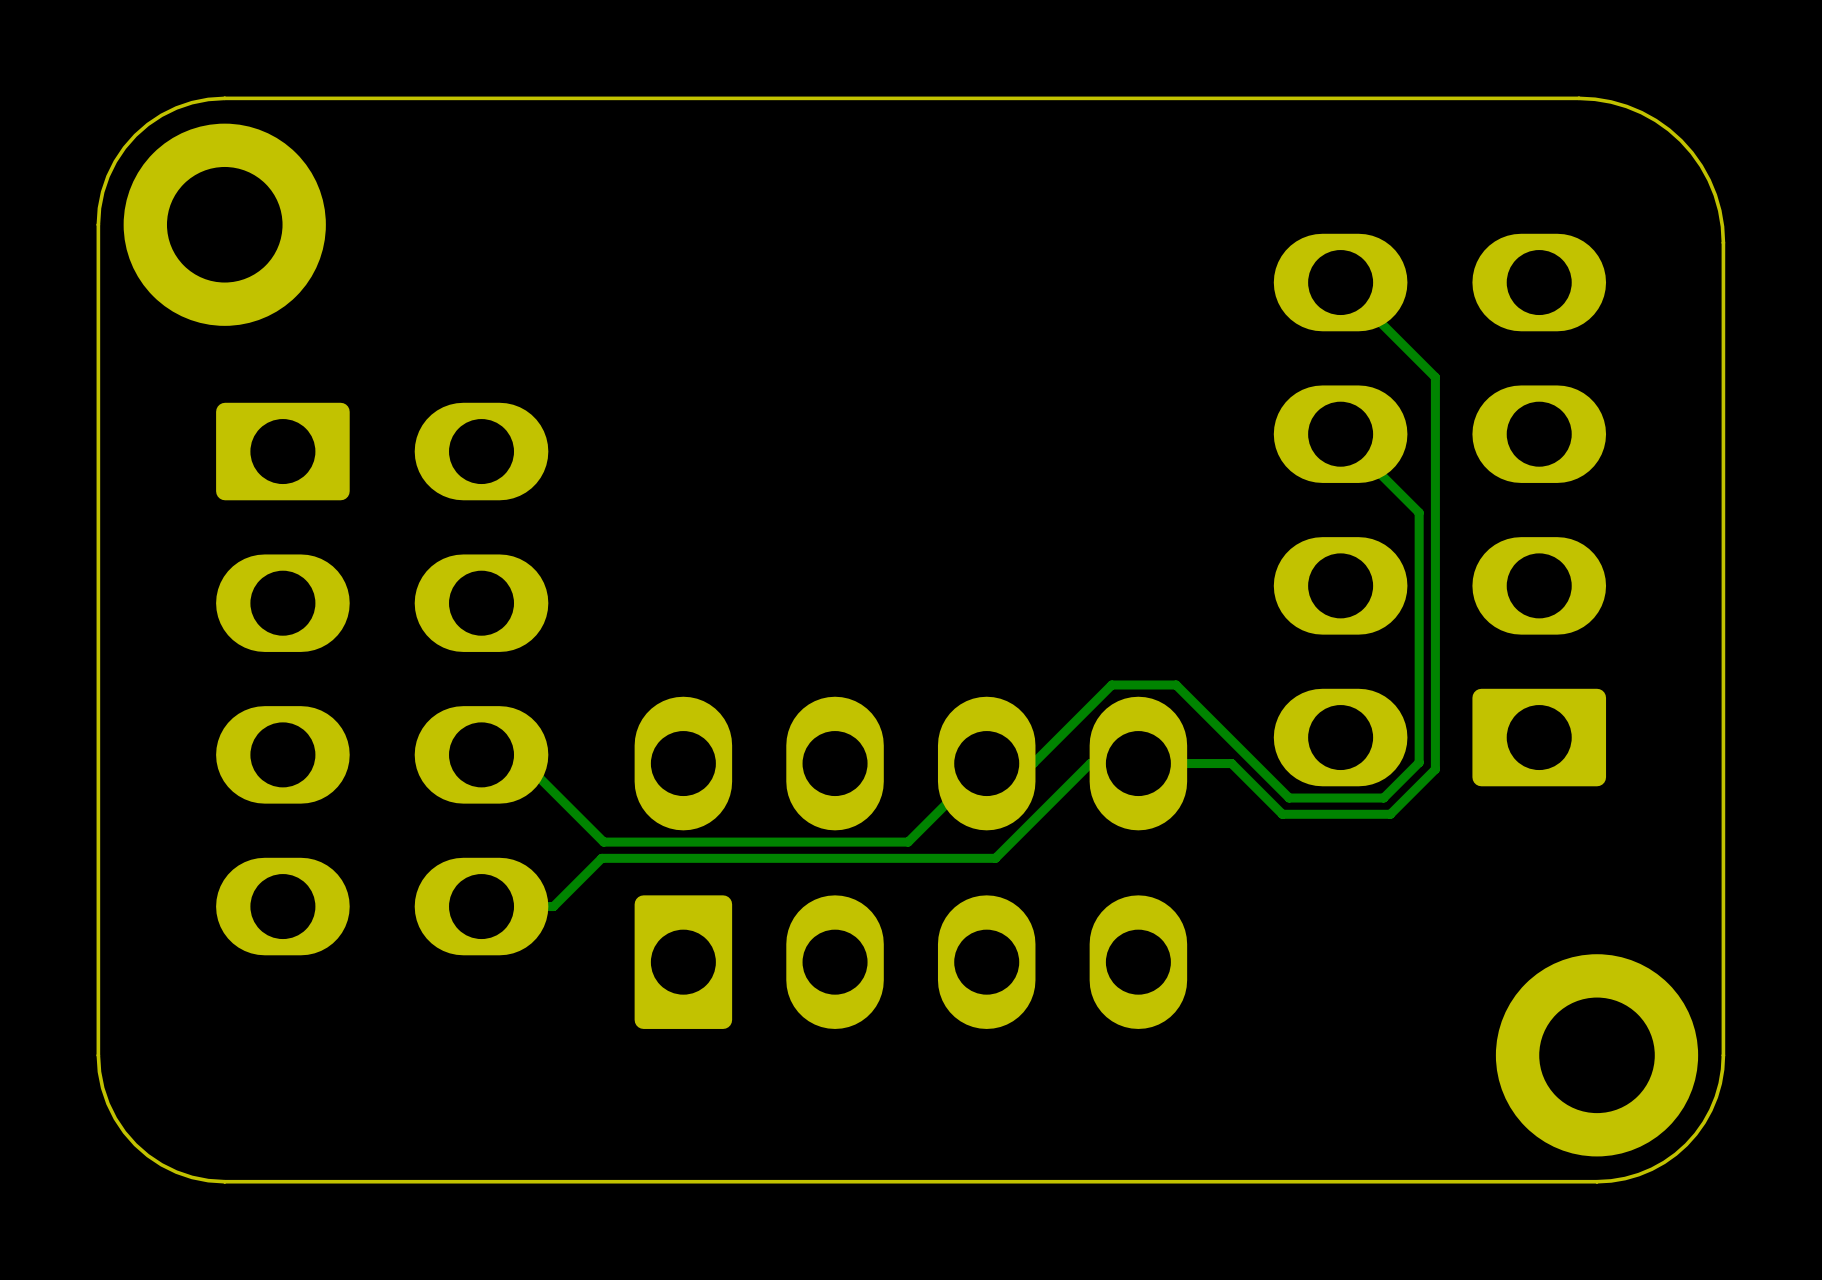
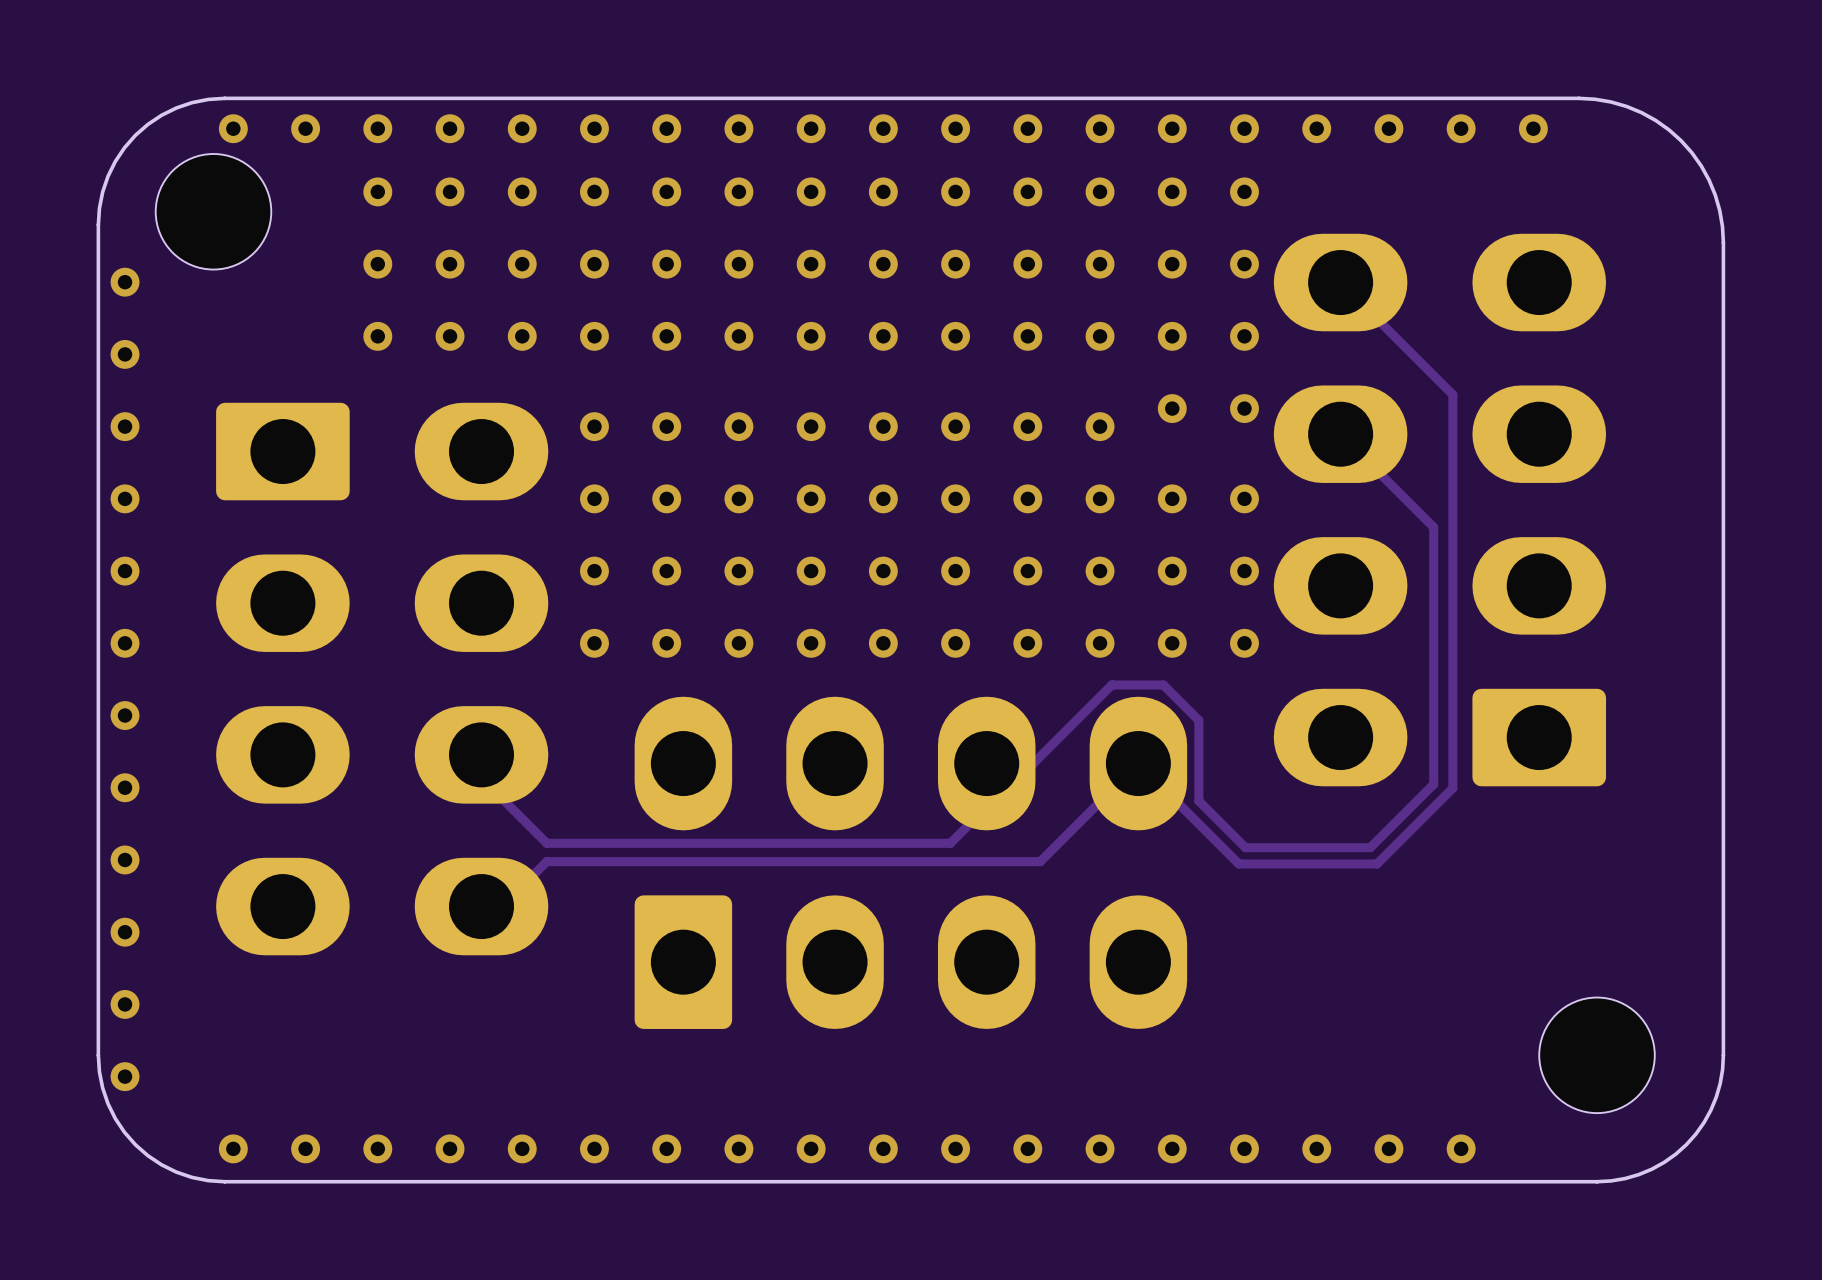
part footprint: [123, 123, 326, 326] -> [155, 153, 272, 270]
via: none -> (233, 128)
via: none -> (305, 128)
via: none -> (377, 128)
via: none -> (450, 128)
via: none -> (522, 128)
via: none -> (594, 128)
via: none -> (666, 128)
via: none -> (738, 128)
via: none -> (811, 128)
via: none -> (883, 128)
via: none -> (955, 128)
via: none -> (1027, 128)
via: none -> (1100, 128)
via: none -> (1172, 128)
via: none -> (1244, 128)
via: none -> (1316, 128)
via: none -> (1388, 128)
via: none -> (1461, 128)
via: none -> (1533, 128)
via: none -> (377, 191)
via: none -> (450, 191)
via: none -> (522, 191)
via: none -> (594, 191)
via: none -> (666, 191)
via: none -> (738, 191)
via: none -> (811, 191)
via: none -> (883, 191)
via: none -> (955, 191)
via: none -> (1027, 191)
via: none -> (1100, 191)
via: none -> (1172, 191)
via: none -> (1244, 191)
via: none -> (377, 264)
via: none -> (450, 264)
via: none -> (522, 264)
via: none -> (594, 264)
via: none -> (666, 264)
via: none -> (738, 264)
via: none -> (811, 264)
via: none -> (883, 264)
via: none -> (955, 264)
via: none -> (1027, 264)
via: none -> (1100, 264)
via: none -> (1172, 264)
via: none -> (1244, 264)
via: none -> (125, 282)
via: none -> (377, 336)
via: none -> (450, 336)
via: none -> (522, 336)
via: none -> (594, 336)
via: none -> (666, 336)
via: none -> (738, 336)
via: none -> (811, 336)
via: none -> (883, 336)
via: none -> (955, 336)
via: none -> (1027, 336)
via: none -> (1100, 336)
via: none -> (1172, 336)
via: none -> (1244, 336)
via: none -> (125, 354)
track: (1435, 377) (1435, 769) (1390, 814) (1282, 814) (1231, 763) (1090, 763) (995, 858) (601, 858) (553, 906) (501, 906) -> (1435, 377) (1452, 394) (1452, 788) (1377, 863) (1238, 863) (1138, 763) (1040, 861) (546, 861) (501, 906)
via: none -> (1172, 408)
via: none -> (1244, 408)
via: none -> (125, 426)
via: none -> (594, 426)
via: none -> (666, 426)
via: none -> (738, 426)
via: none -> (811, 426)
via: none -> (883, 426)
via: none -> (955, 426)
via: none -> (1027, 426)
via: none -> (1100, 426)
via: none -> (125, 498)
via: none -> (594, 498)
via: none -> (666, 498)
via: none -> (738, 498)
via: none -> (811, 498)
via: none -> (883, 498)
via: none -> (955, 498)
via: none -> (1027, 498)
via: none -> (1100, 498)
via: none -> (1172, 498)
via: none -> (1244, 498)
track: (1419, 512) (1419, 762) (1383, 798) (1289, 798) (1176, 685) (1163, 685) -> (1419, 512) (1433, 527) (1433, 784) (1370, 847) (1245, 847) (1198, 801) (1198, 720) (1163, 685)
via: none -> (125, 571)
via: none -> (594, 571)
via: none -> (666, 571)
via: none -> (738, 571)
via: none -> (811, 571)
via: none -> (883, 571)
via: none -> (955, 571)
via: none -> (1027, 571)
via: none -> (1100, 571)
via: none -> (1172, 571)
via: none -> (1244, 571)
via: none -> (125, 643)
via: none -> (594, 643)
via: none -> (666, 643)
via: none -> (738, 643)
via: none -> (811, 643)
via: none -> (883, 643)
via: none -> (955, 643)
via: none -> (1027, 643)
via: none -> (1100, 643)
via: none -> (1172, 643)
via: none -> (1244, 643)
via: none -> (125, 715)
track: (481, 754) (516, 754) (603, 842) (908, 842) (986, 763) -> (481, 754) (481, 777) (546, 843) (950, 843) (986, 806) (986, 763)
via: none -> (125, 787)
via: none -> (125, 859)
via: none -> (125, 932)
part footprint: [1495, 954, 1699, 1157] -> [1539, 997, 1655, 1114]
via: none -> (125, 1004)
via: none -> (125, 1076)
via: none -> (233, 1148)
via: none -> (305, 1148)
via: none -> (377, 1148)
via: none -> (450, 1148)
via: none -> (522, 1148)
via: none -> (594, 1148)
via: none -> (666, 1148)
via: none -> (738, 1148)
via: none -> (811, 1148)
via: none -> (883, 1148)
via: none -> (955, 1148)
via: none -> (1027, 1148)
via: none -> (1100, 1148)
via: none -> (1172, 1148)
via: none -> (1244, 1148)
via: none -> (1316, 1148)
via: none -> (1388, 1148)
via: none -> (1461, 1148)

